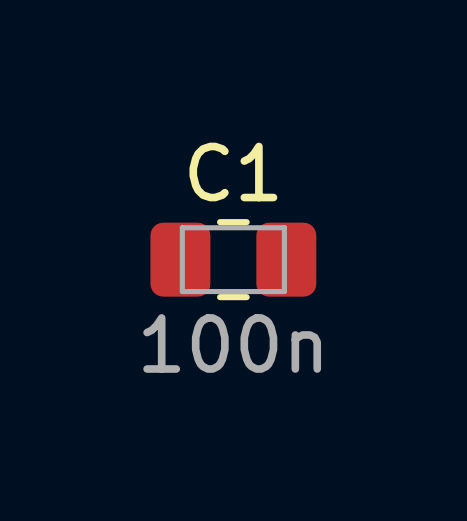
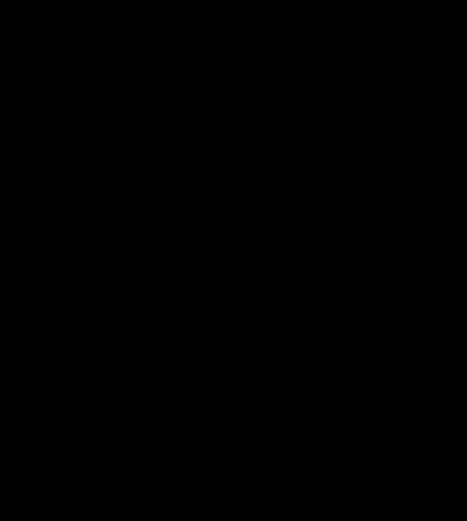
C1: 100n (233, 259) -> none

